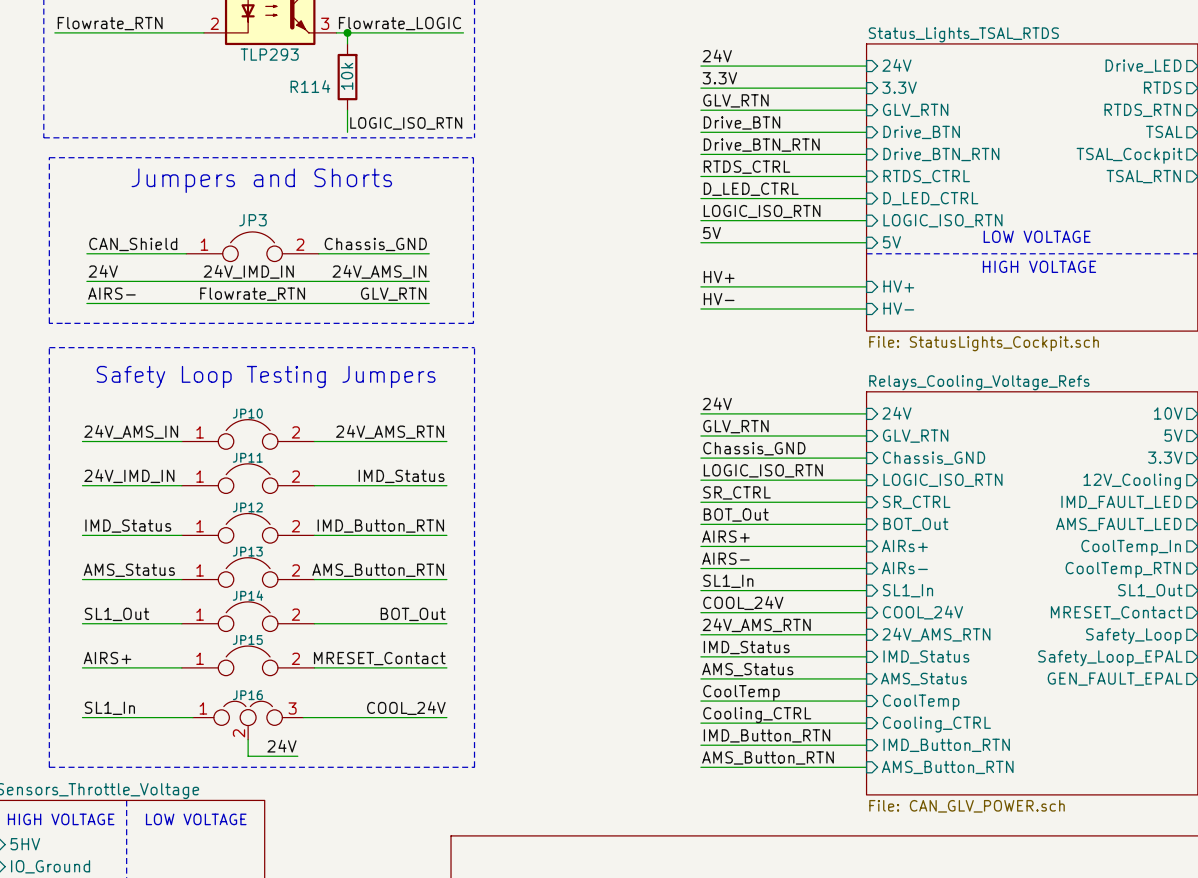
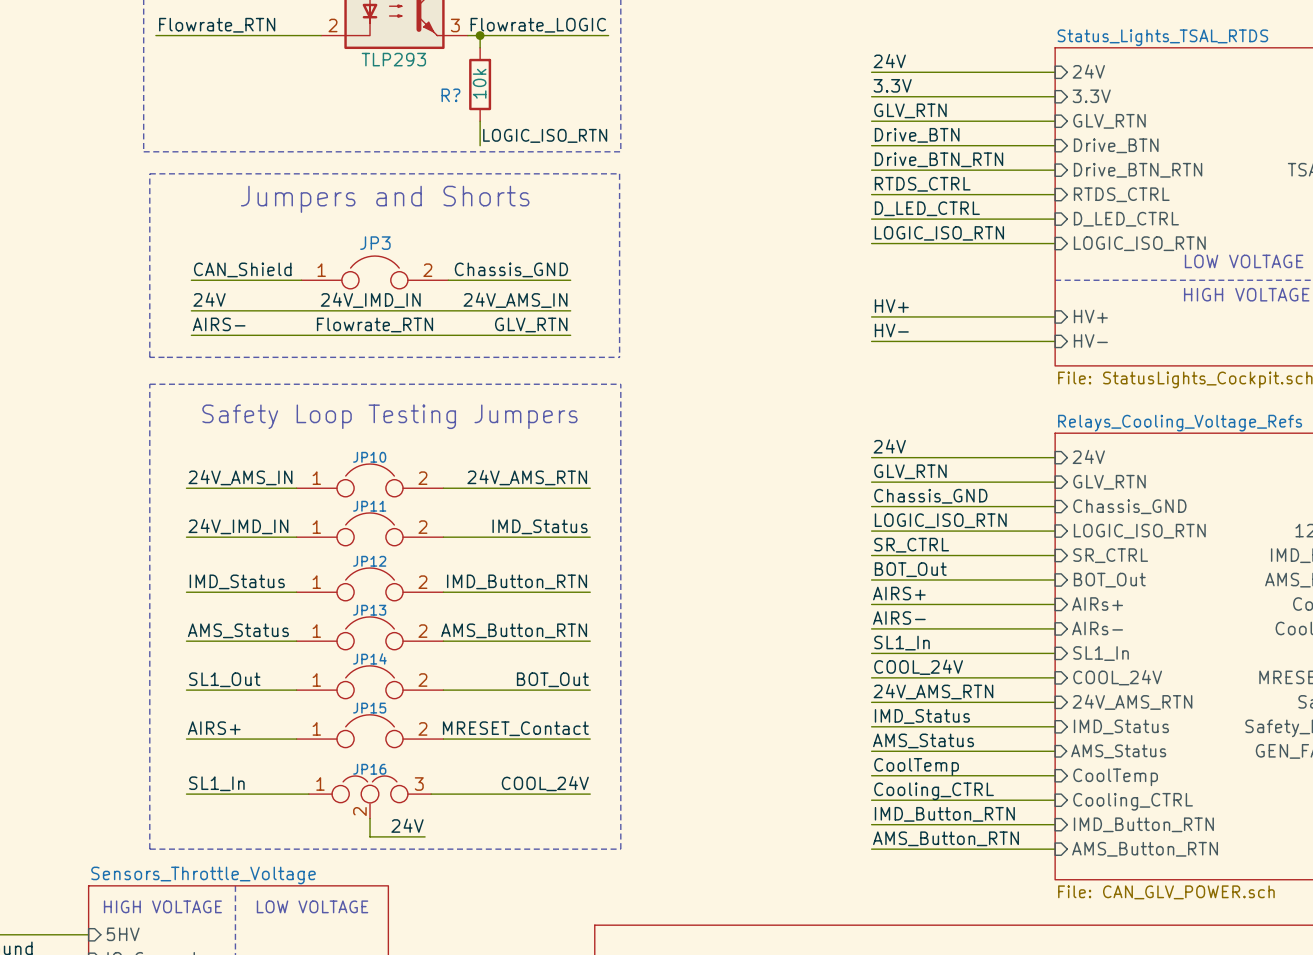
R114 name: R114 (310, 86) -> R? (450, 95)
label: 5V (712, 233) -> none
wire: (700, 242) (866, 242) -> none
sheet pin: 5V (891, 242) -> none

